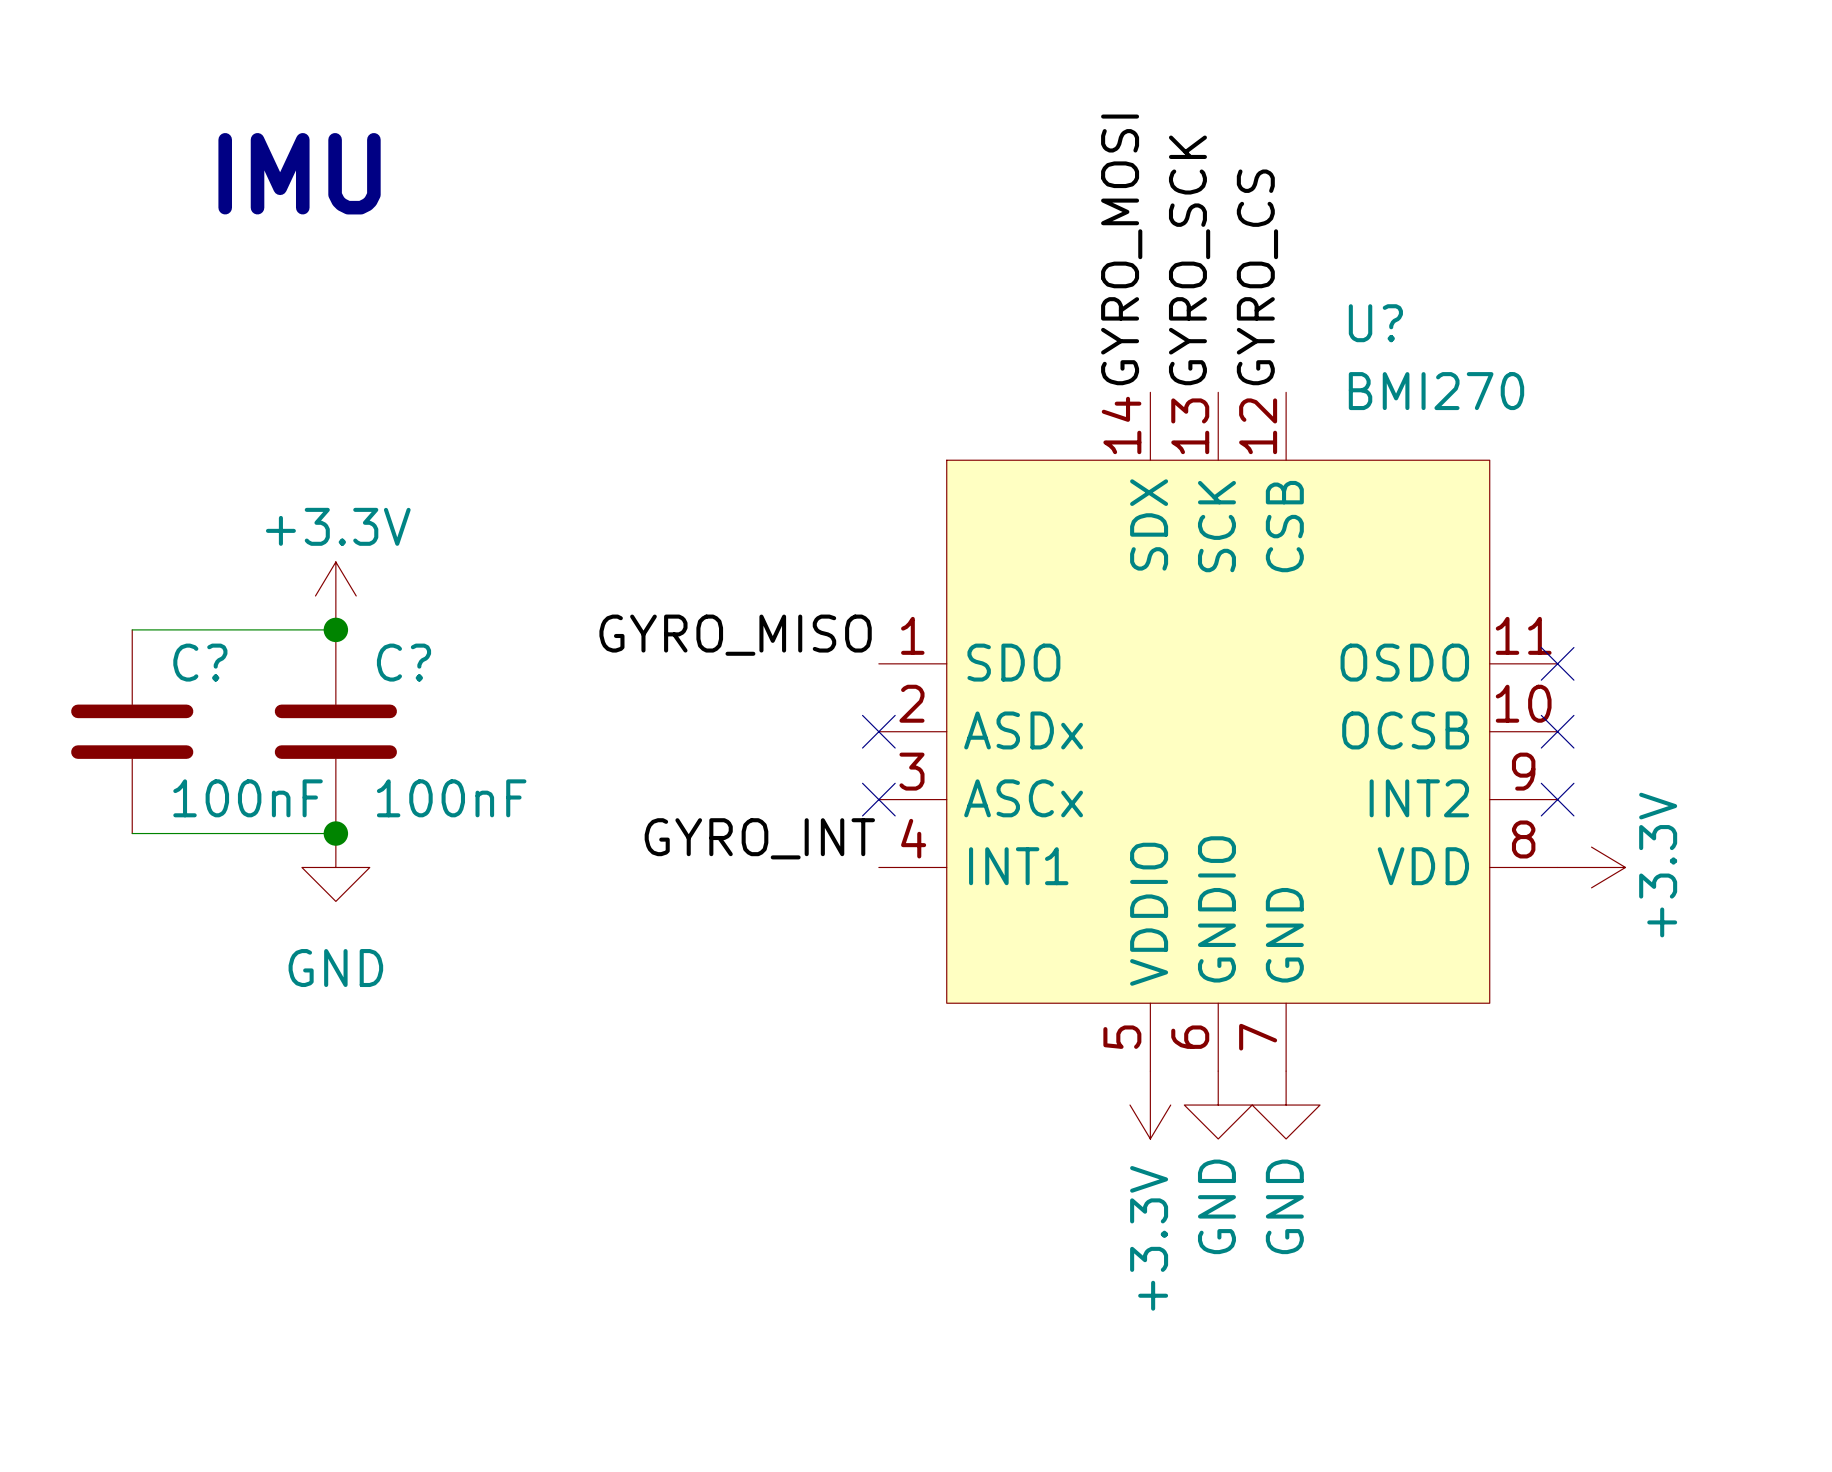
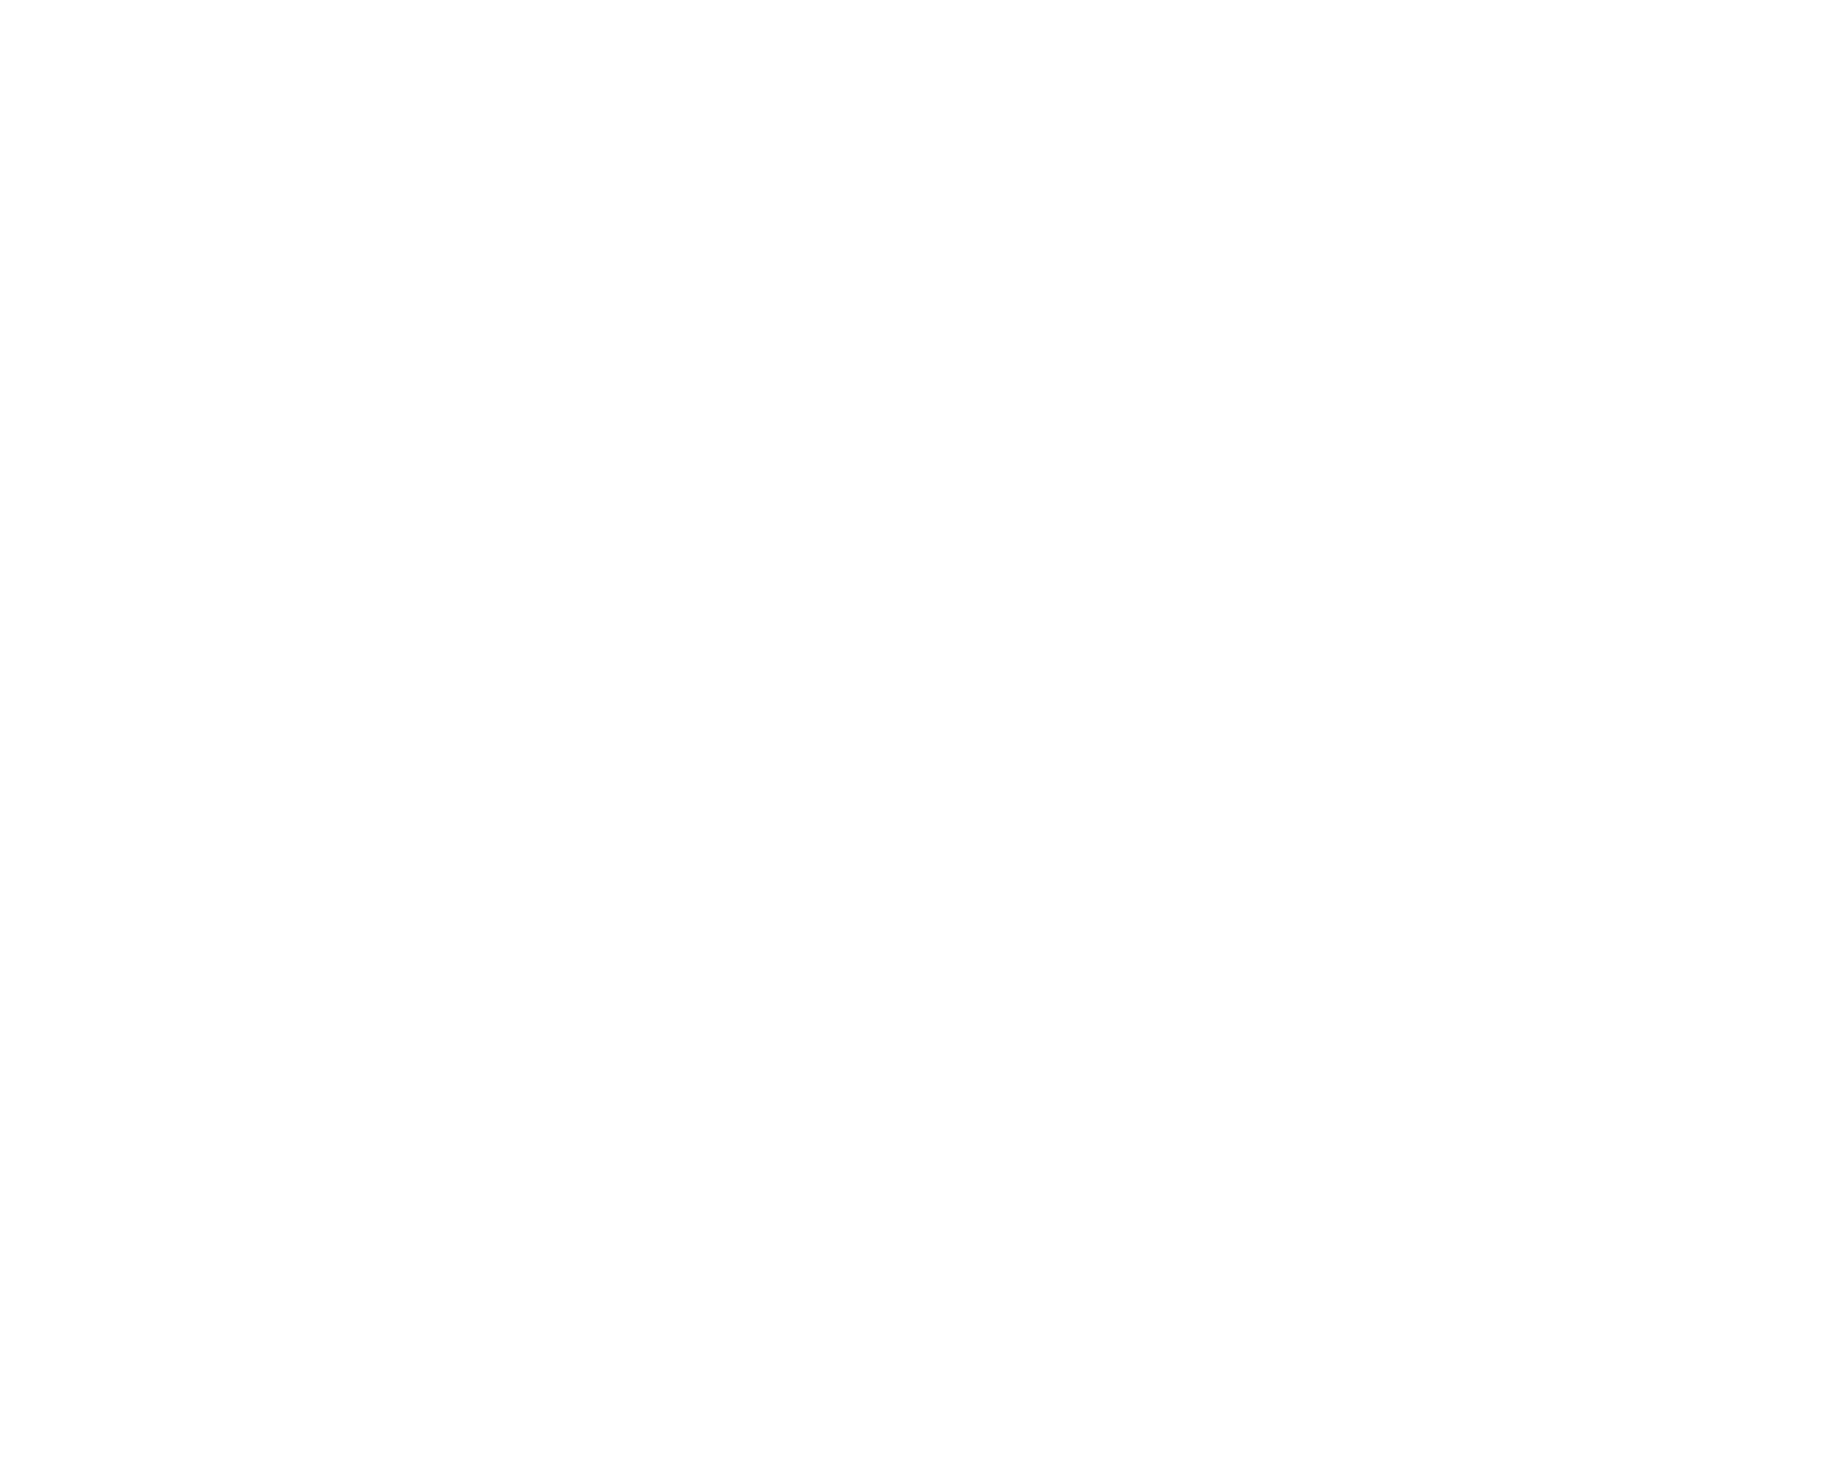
text: IMU (299, 173) -> none
label: GYRO_MOSI (1121, 249) -> none
label: GYRO_SCK (1189, 260) -> none
label: GYRO_CS (1257, 277) -> none
power symbol: +3.3V (335, 595) -> none
wire: (132, 629) (335, 629) -> none
junction: (335, 629) -> none
label: GYRO_MISO (735, 635) -> none
no-connect mark: (1557, 663) -> none
C?: 100nF (132, 731) -> none
C?: 100nF (335, 731) -> none
no-connect mark: (878, 731) -> none
U?: BMI270 (1218, 731) -> none
no-connect mark: (1557, 731) -> none
no-connect mark: (878, 799) -> none
no-connect mark: (1557, 799) -> none
wire: (132, 833) (335, 833) -> none
junction: (335, 833) -> none
label: GYRO_INT (759, 838) -> none
power symbol: GND (335, 867) -> none
power symbol: +3.3V (1591, 867) -> none
power symbol: +3.3V (1150, 1105) -> none
power symbol: GND (1218, 1105) -> none
power symbol: GND (1286, 1105) -> none

